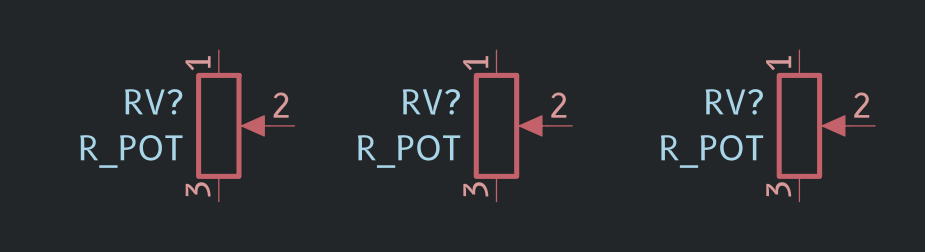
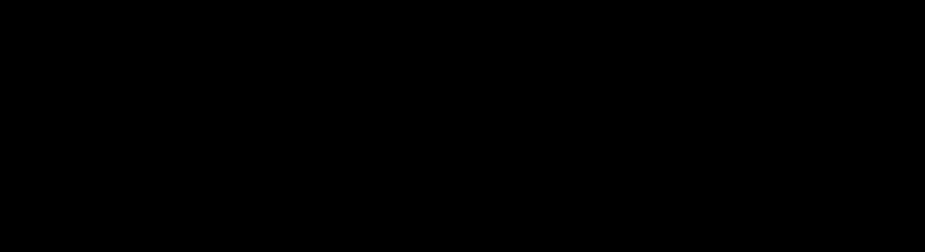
RV?: R_POT (245, 125) -> none
RV?: R_POT (522, 125) -> none
RV?: R_POT (825, 125) -> none

